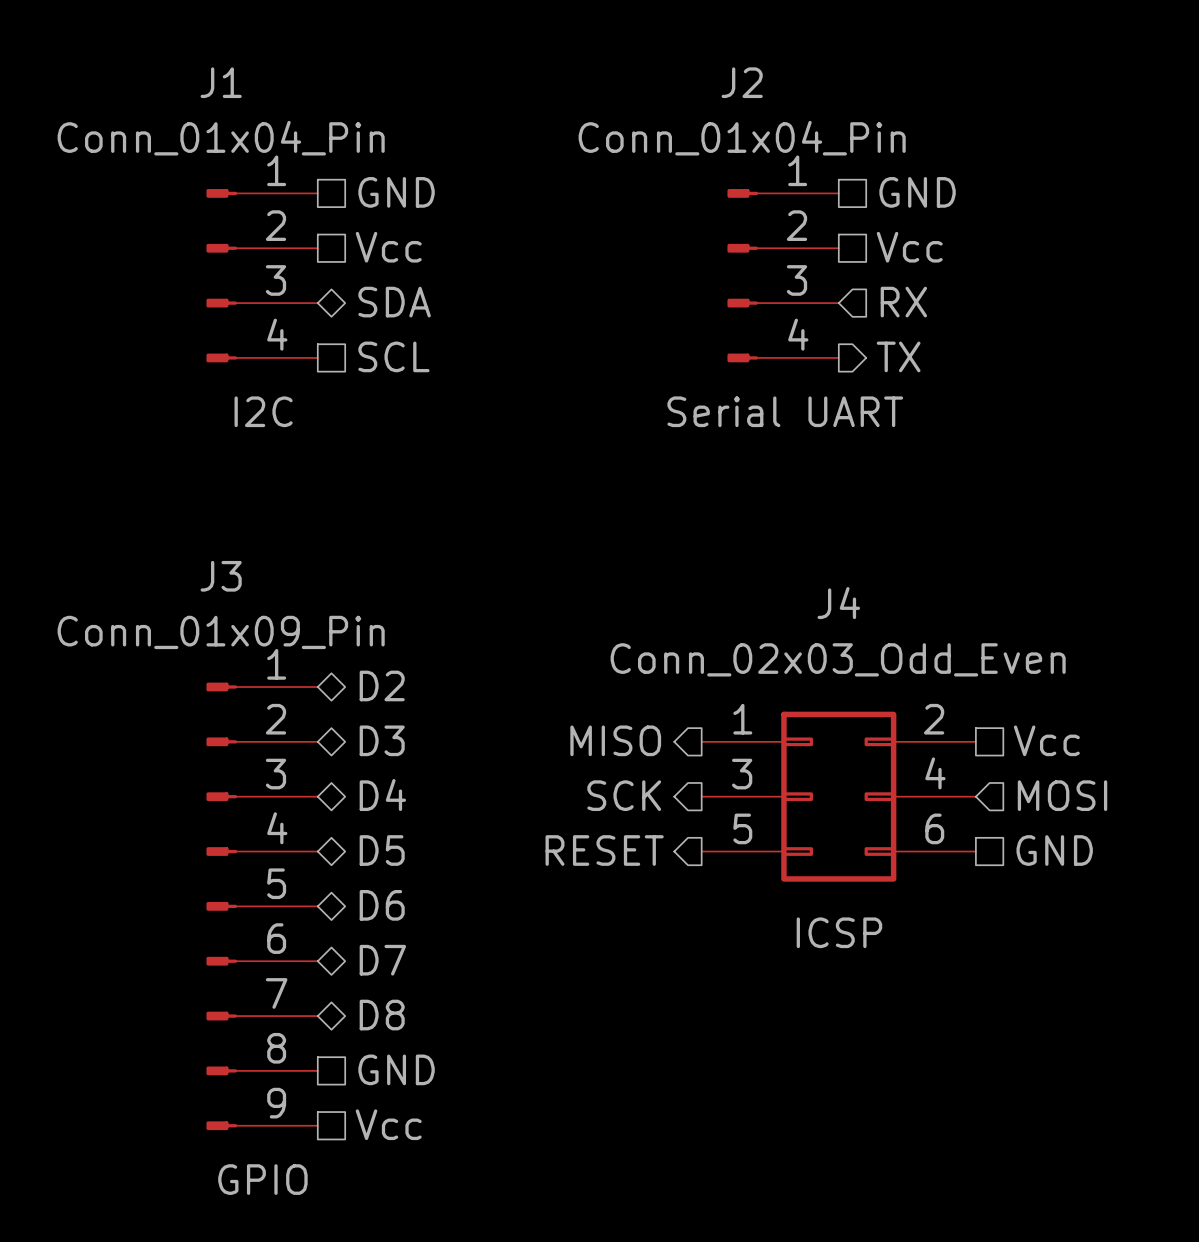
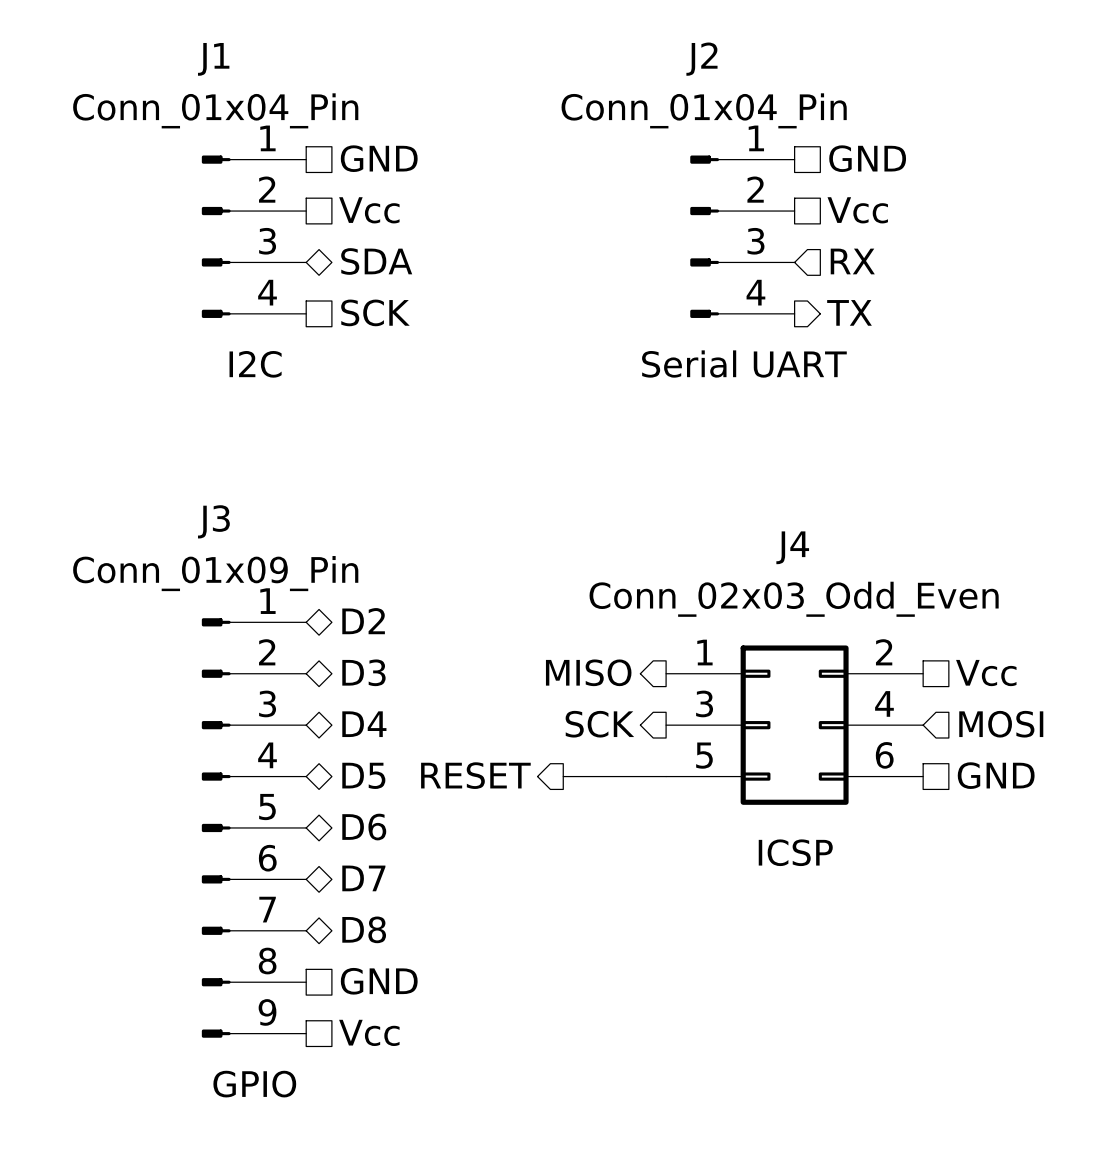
hierarchical label: SCL (393, 356) -> SCK (375, 312)
hierarchical label position: RESET (604, 850) -> RESET (475, 775)
wire: none -> (563, 776) (666, 776)

